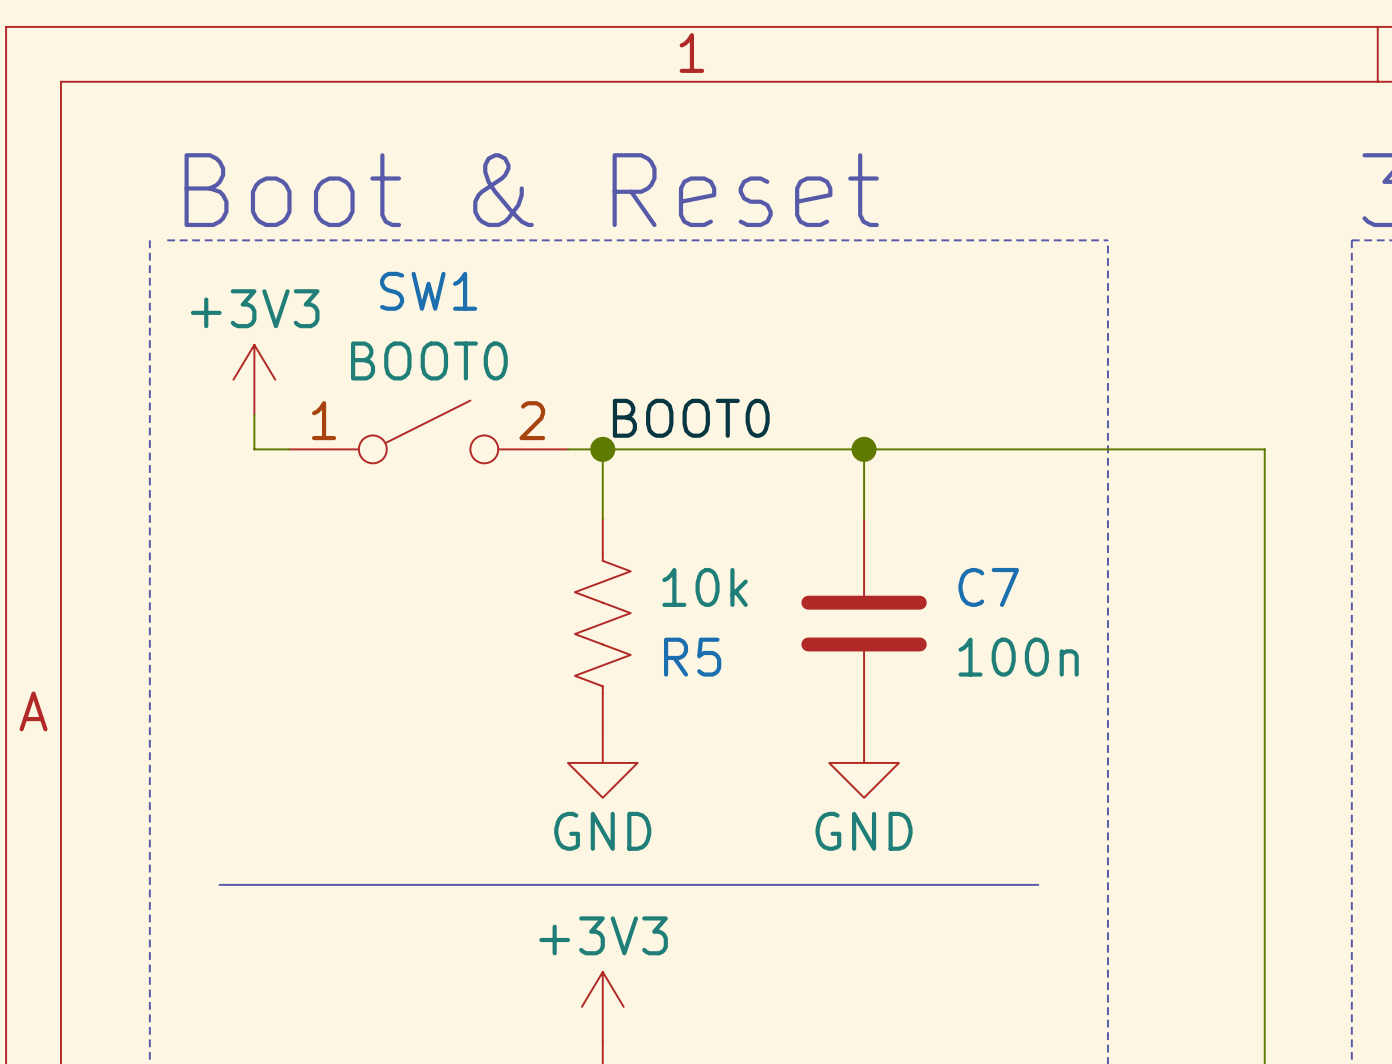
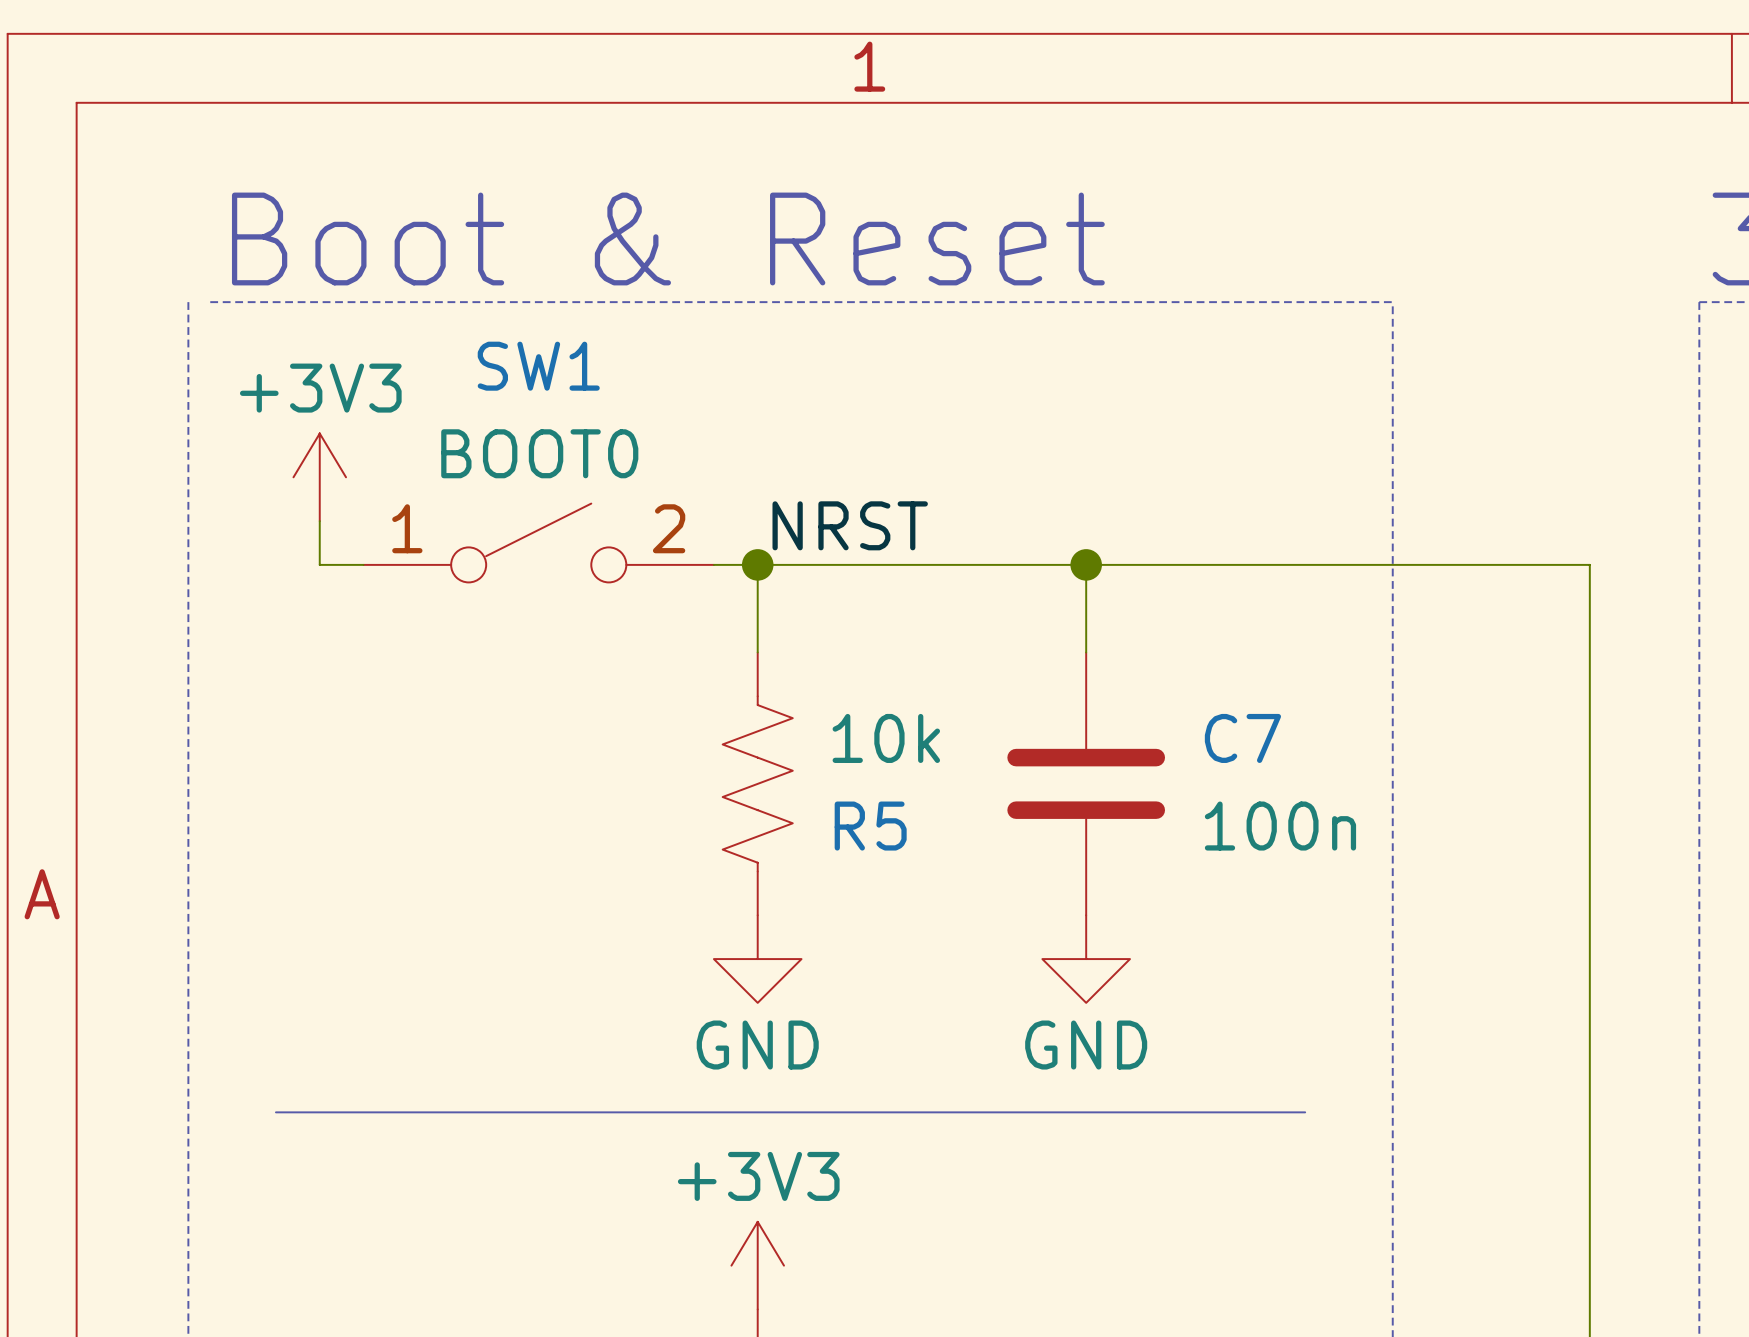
label: none -> NRST (850, 525)
label: BOOT0 (691, 418) -> none

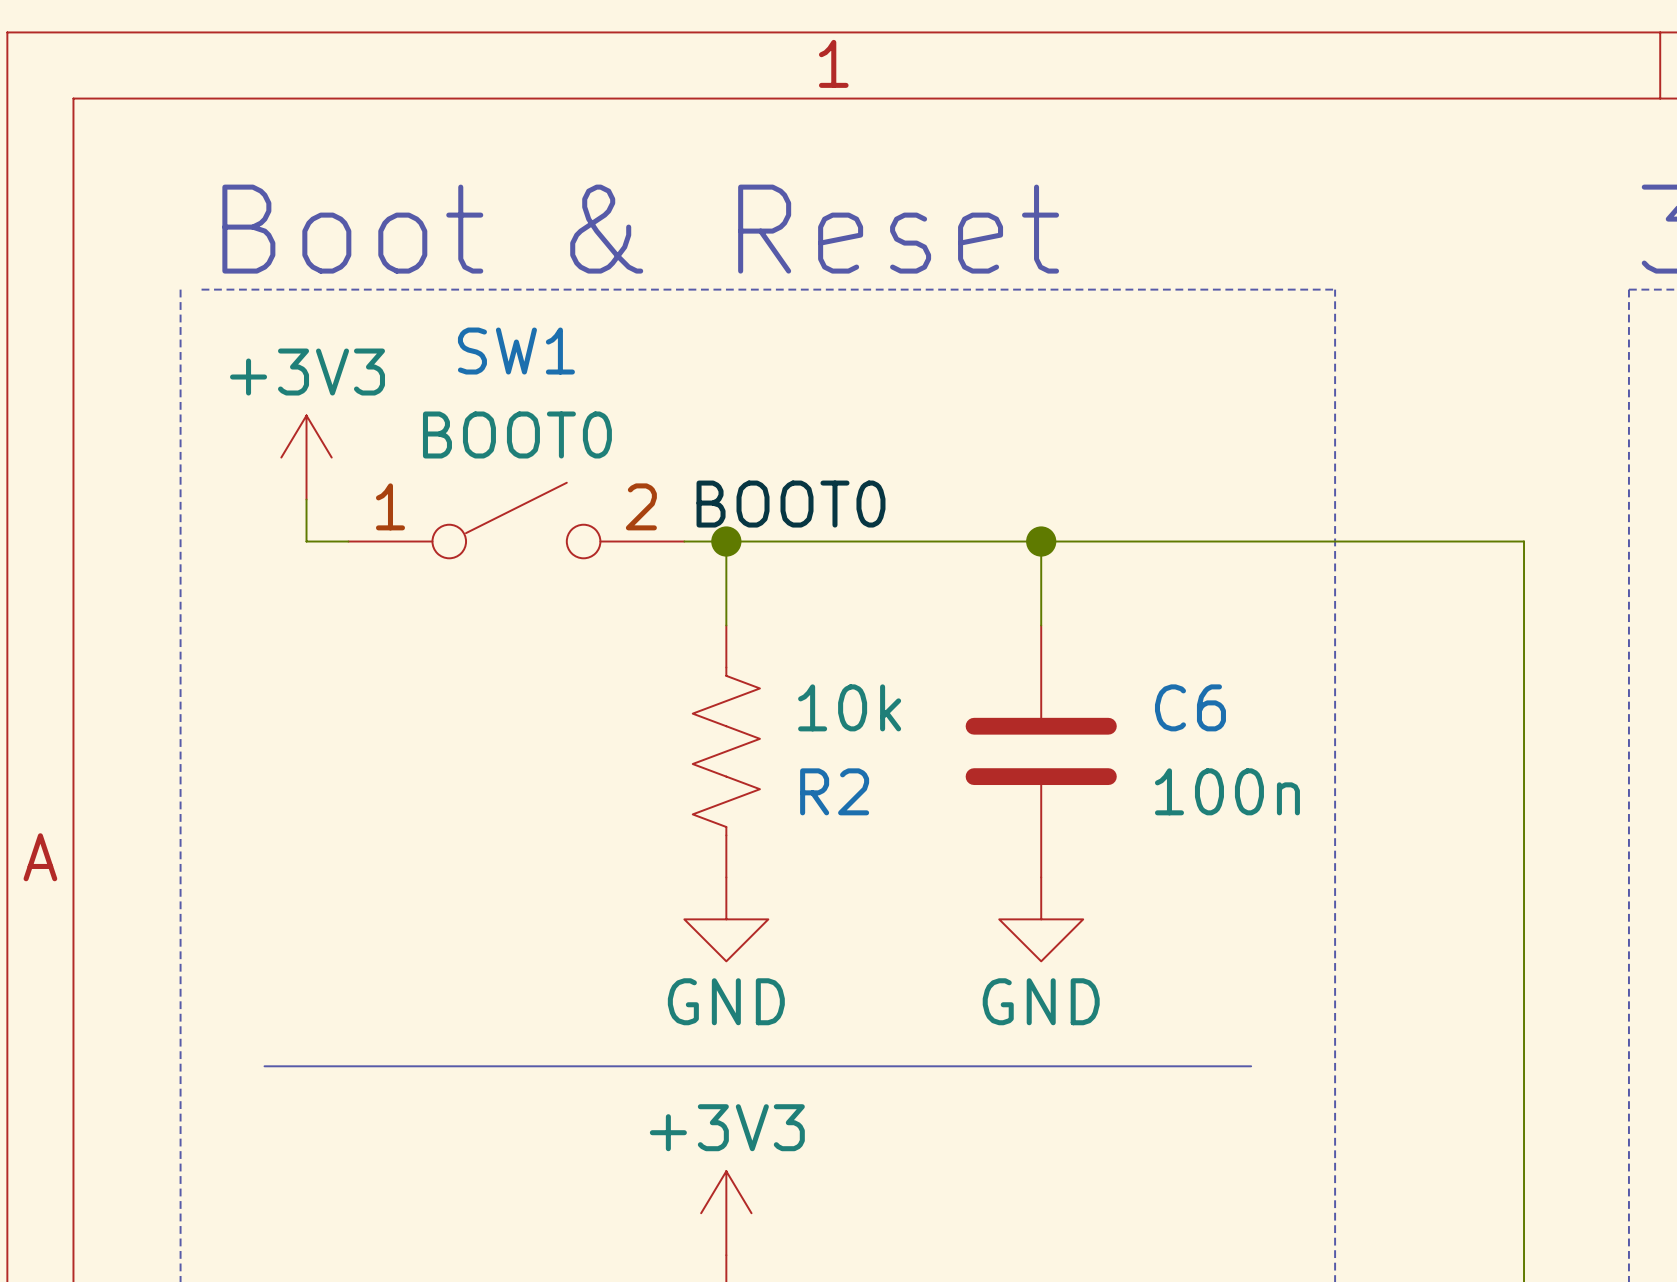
label: NRST (850, 525) -> BOOT0 (791, 504)
C7 name: C7 (1242, 738) -> C6 (1190, 707)
R5 name: R5 (870, 826) -> R2 (834, 791)

